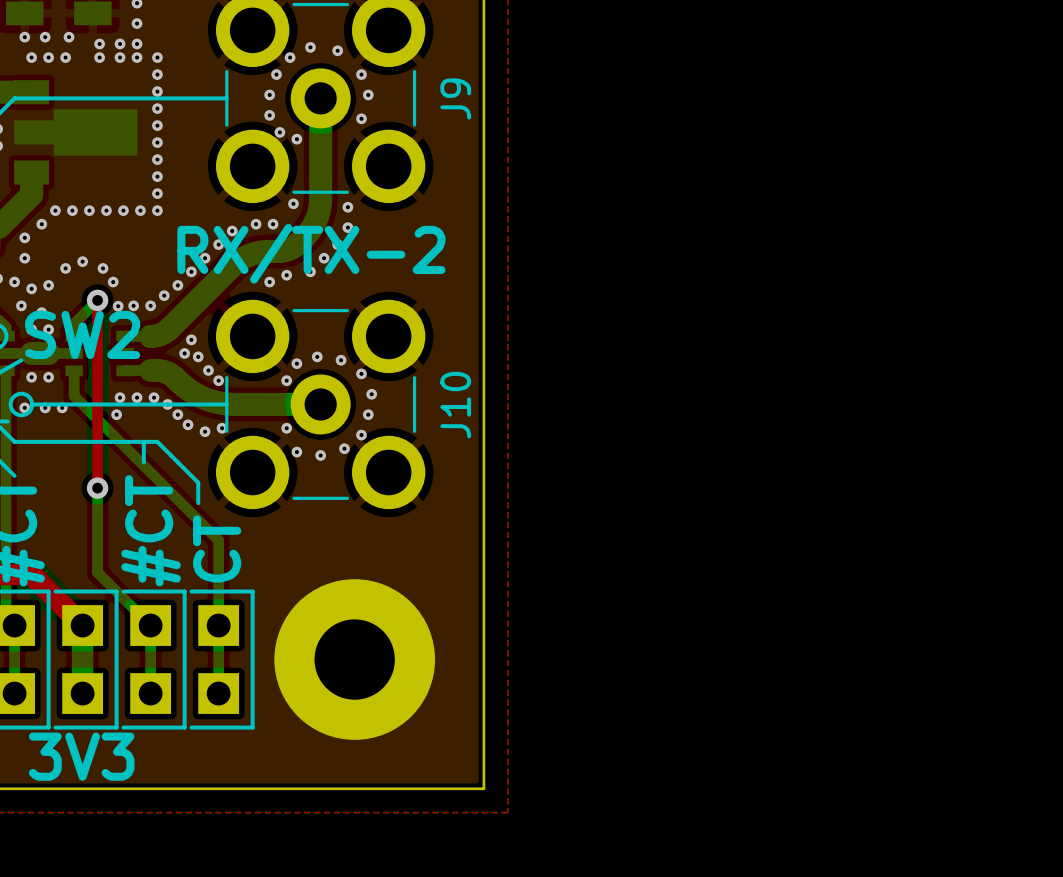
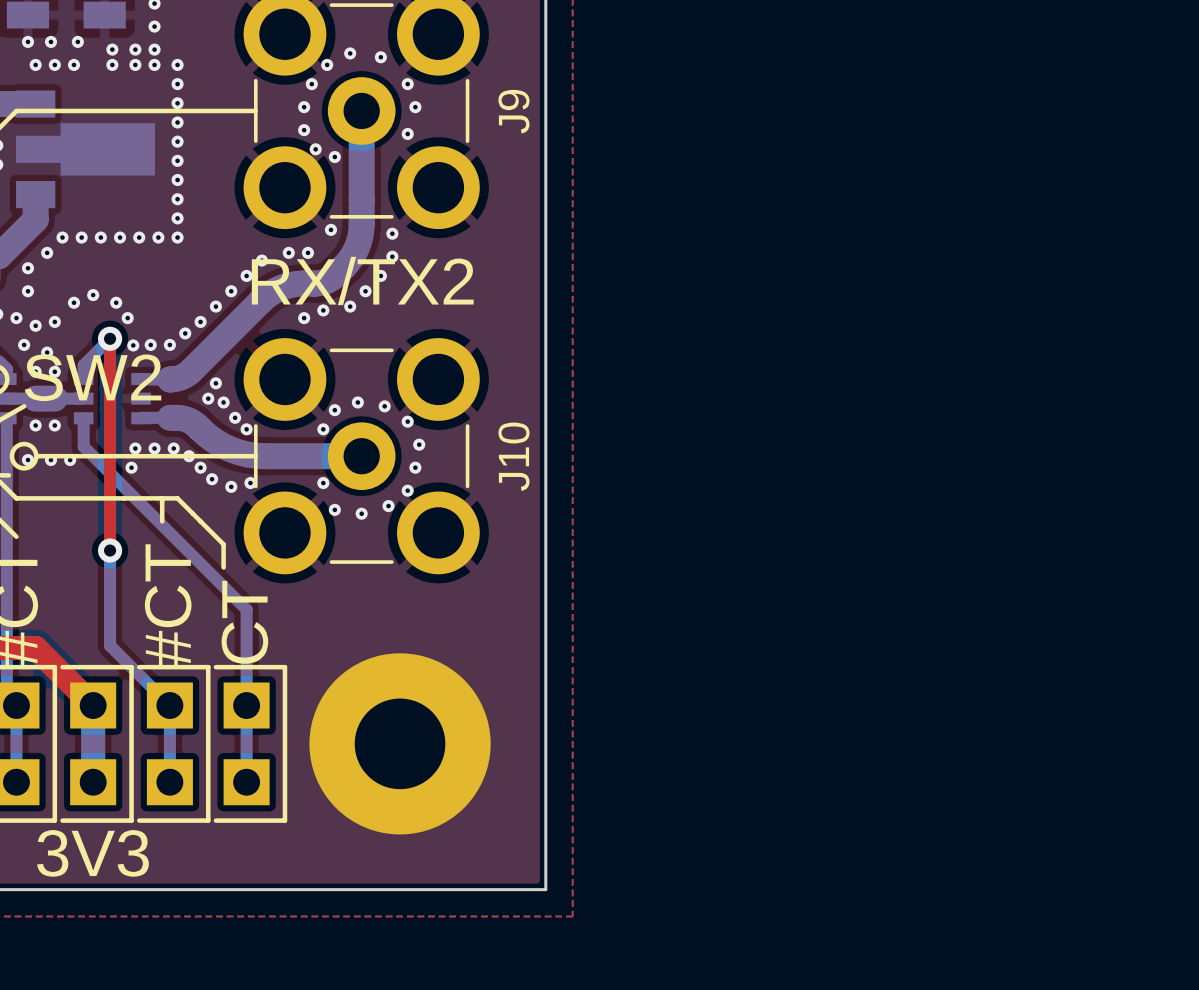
text: RX/TX-2 (311, 253) -> RX/TX2 (362, 281)

